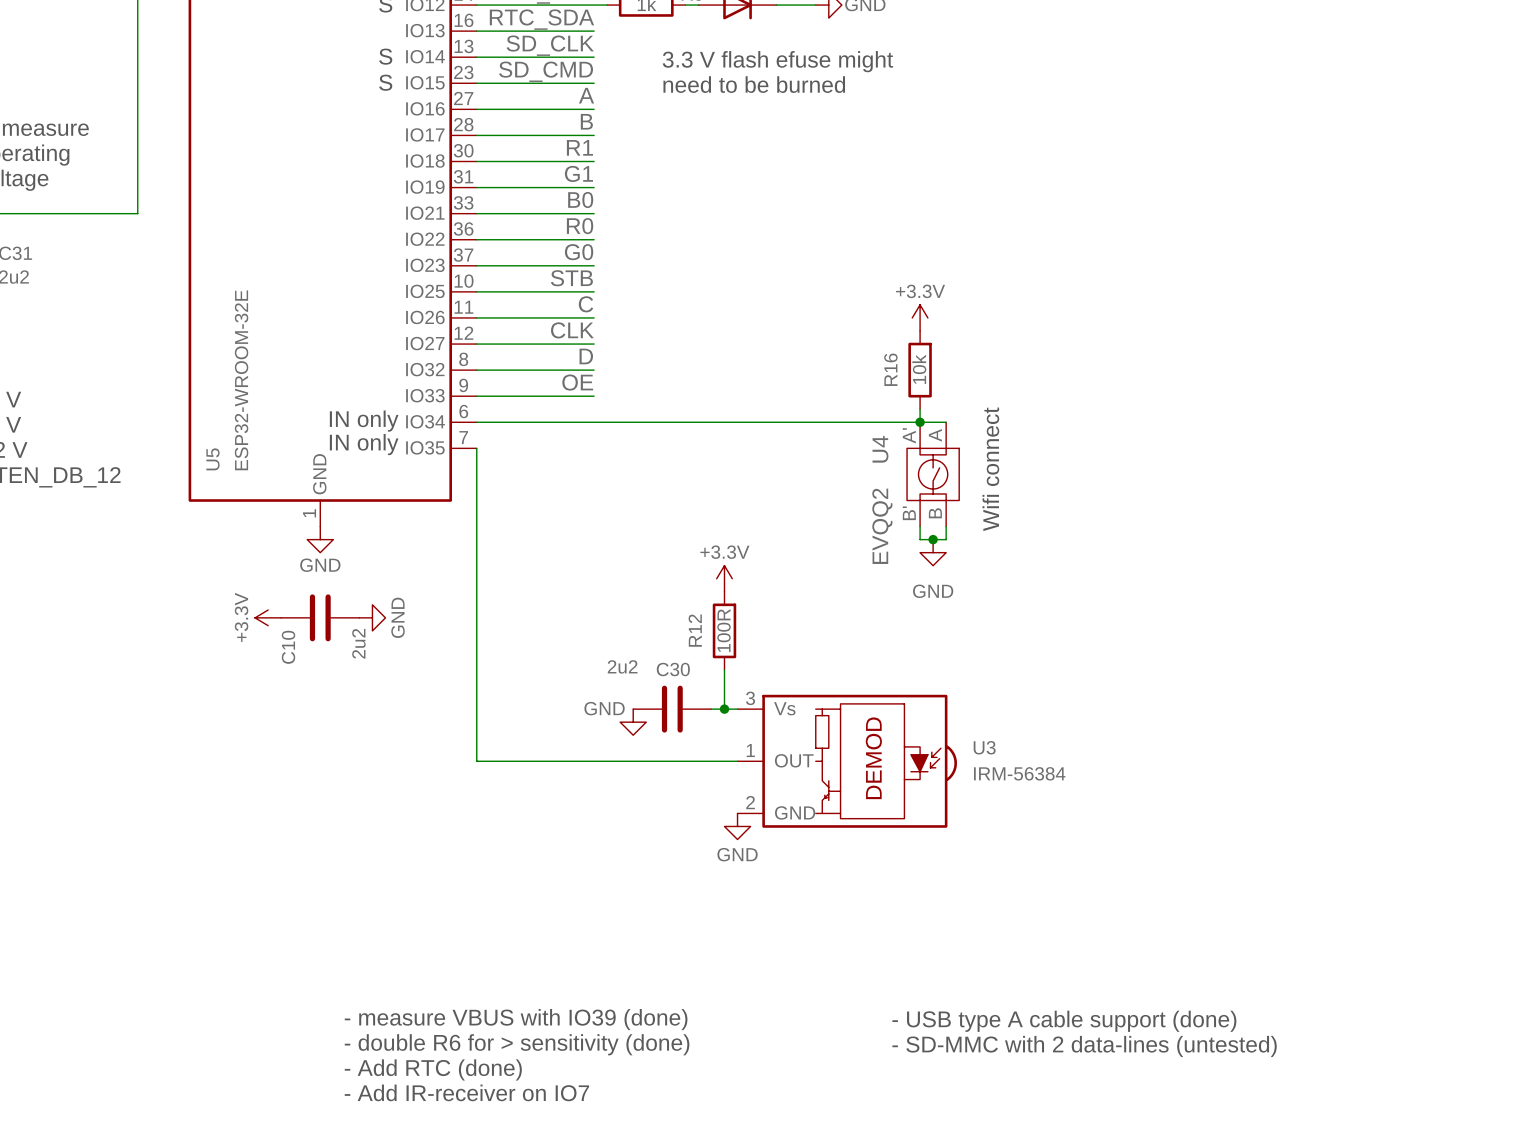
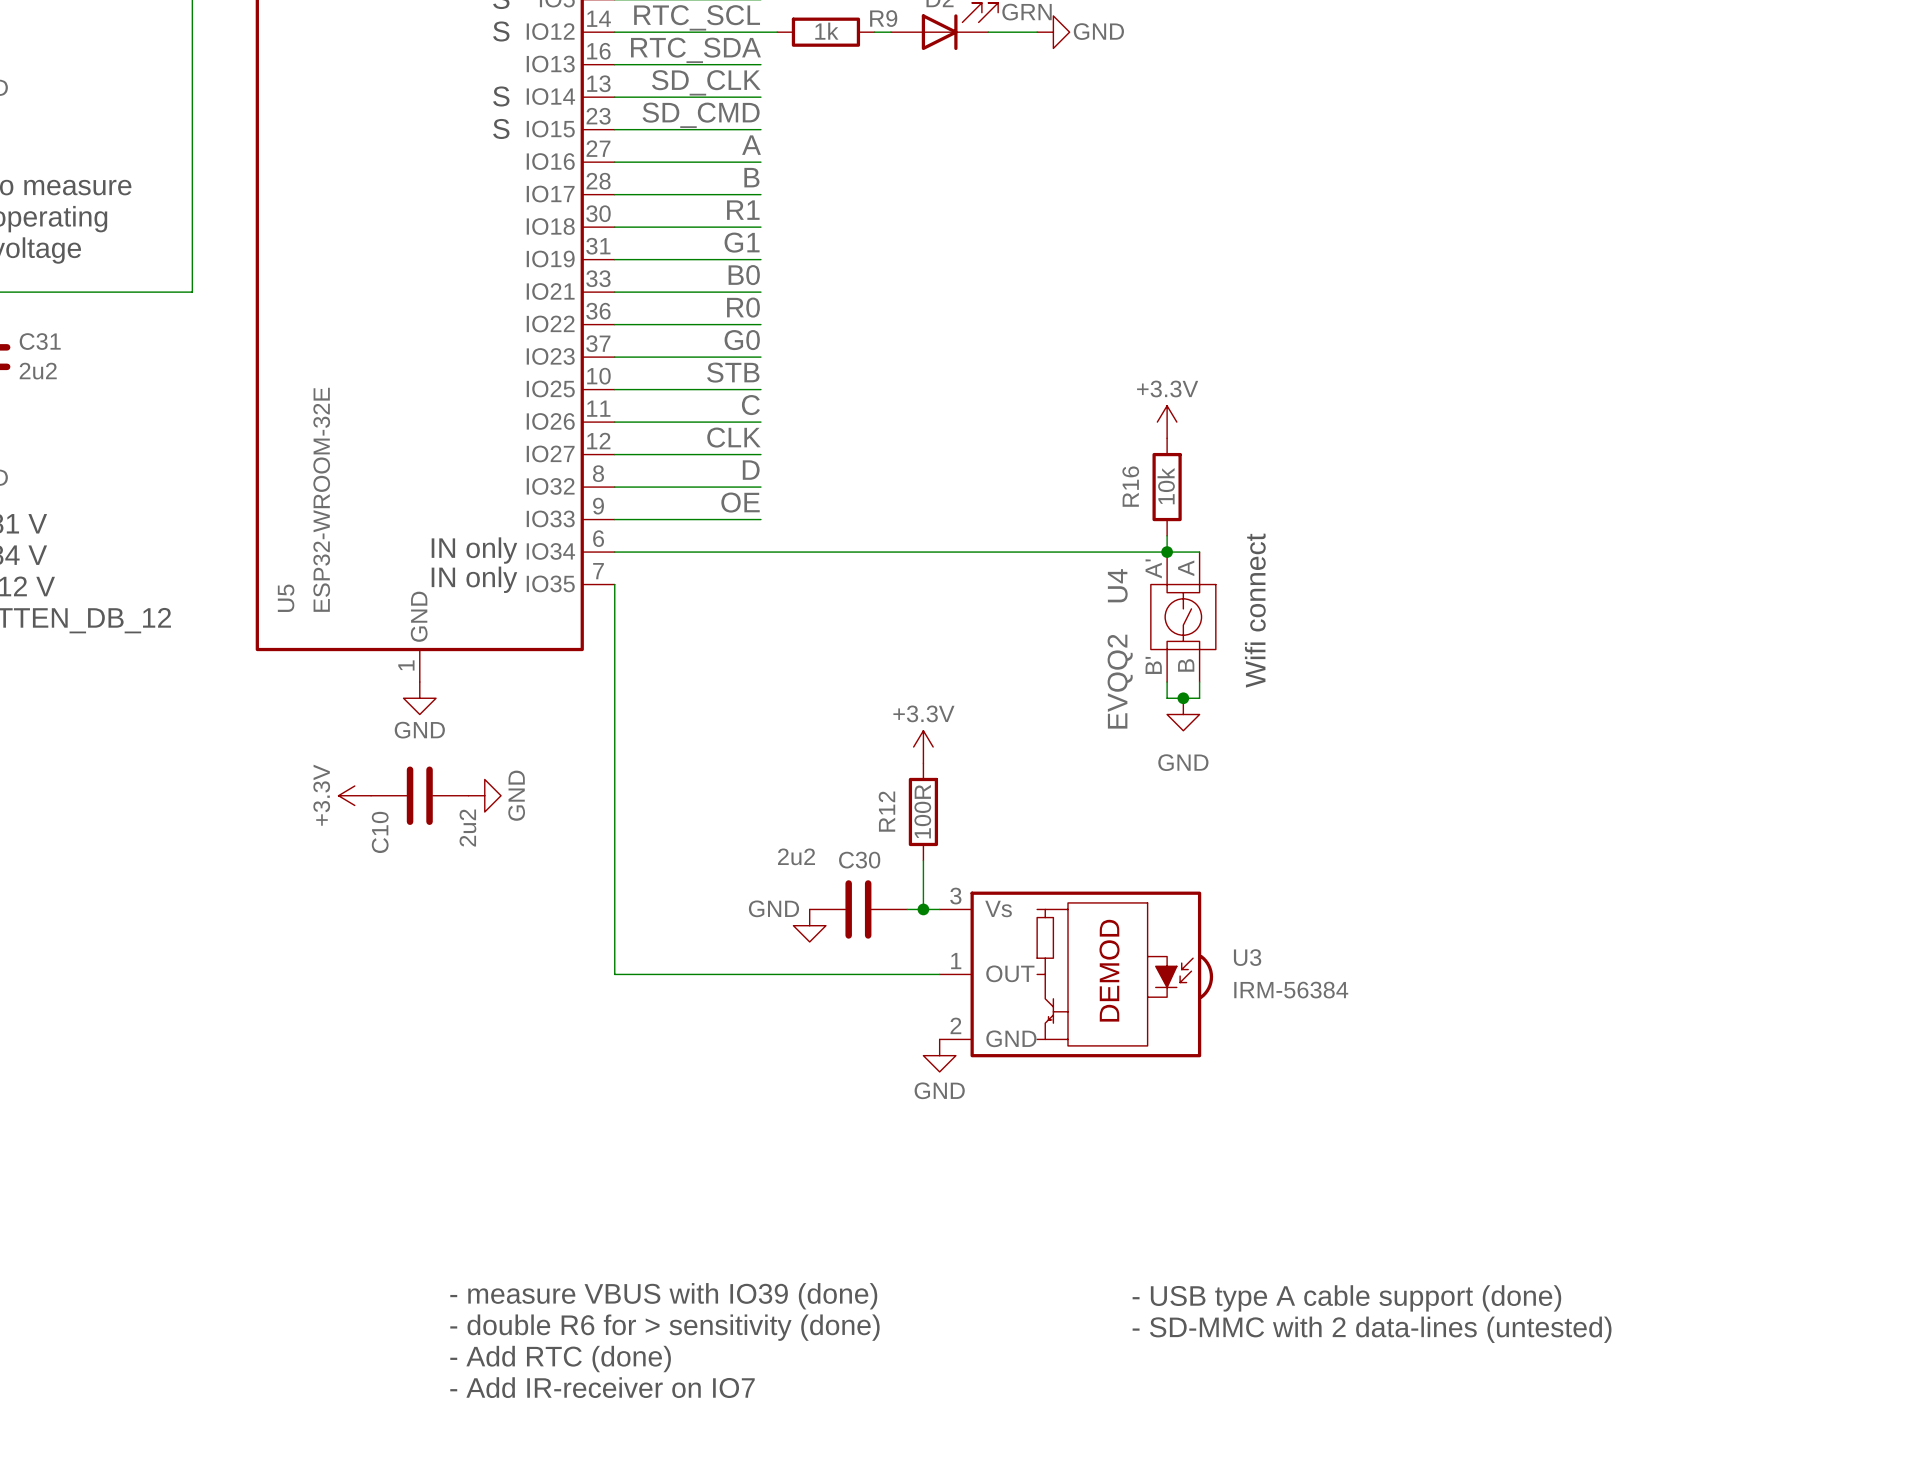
text: 3.3 V flash efuse might (777, 61) -> none
text: need to be burned (754, 84) -> none

